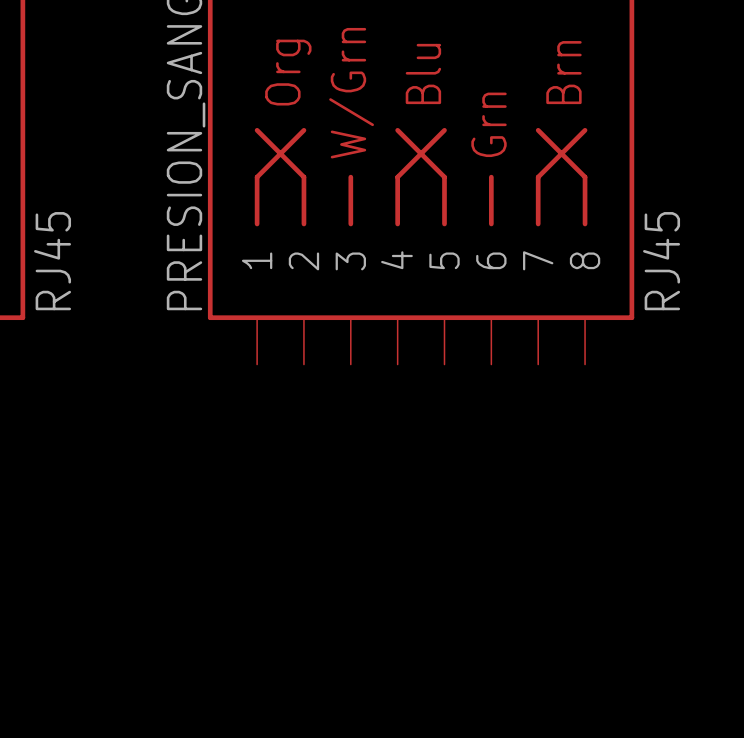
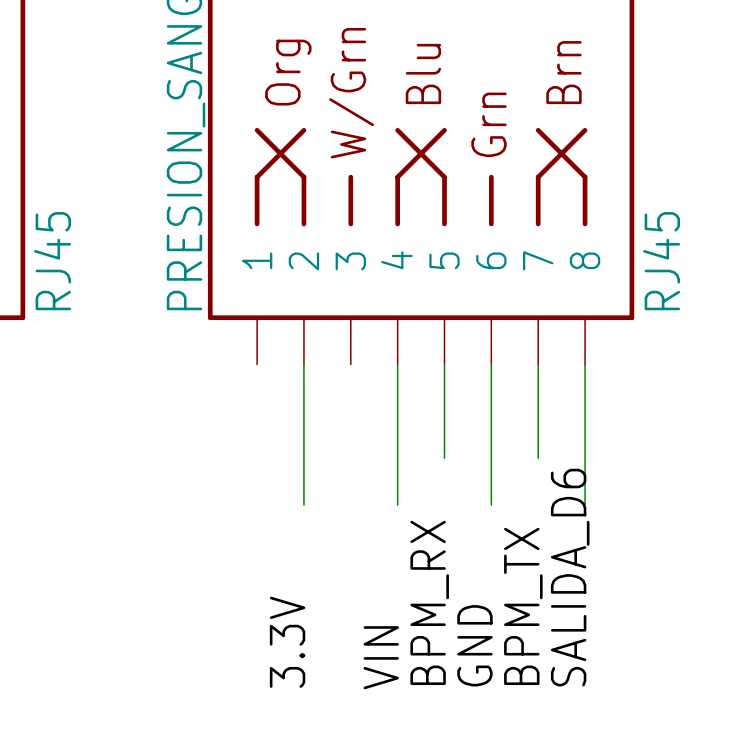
wire: none -> (303, 364) (303, 505)
wire: none -> (397, 364) (397, 505)
wire: none -> (444, 364) (444, 458)
wire: none -> (491, 364) (491, 505)
wire: none -> (538, 364) (538, 458)
wire: none -> (585, 364) (585, 505)
label: none -> SALIDA_D6 (570, 577)
label: none -> BPM_RX (429, 602)
label: none -> BPM_TX (523, 606)
label: none -> 3.3V (287, 642)
label: none -> GND (474, 645)
label: none -> VIN (381, 657)

